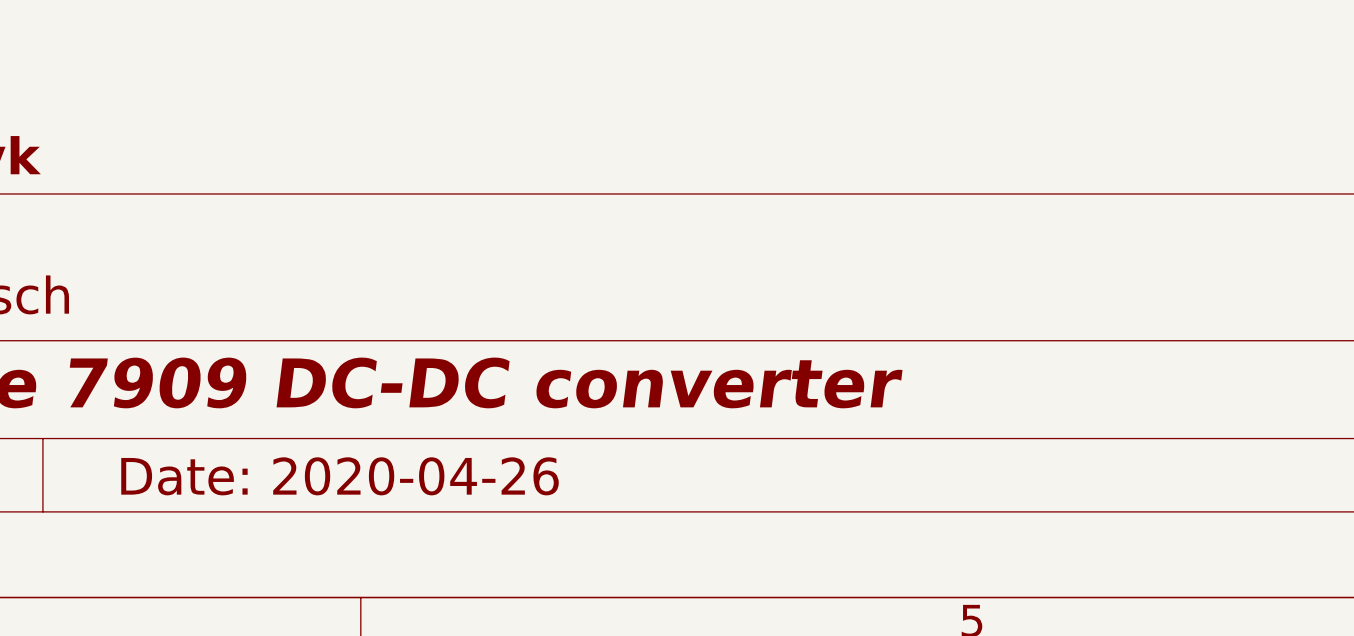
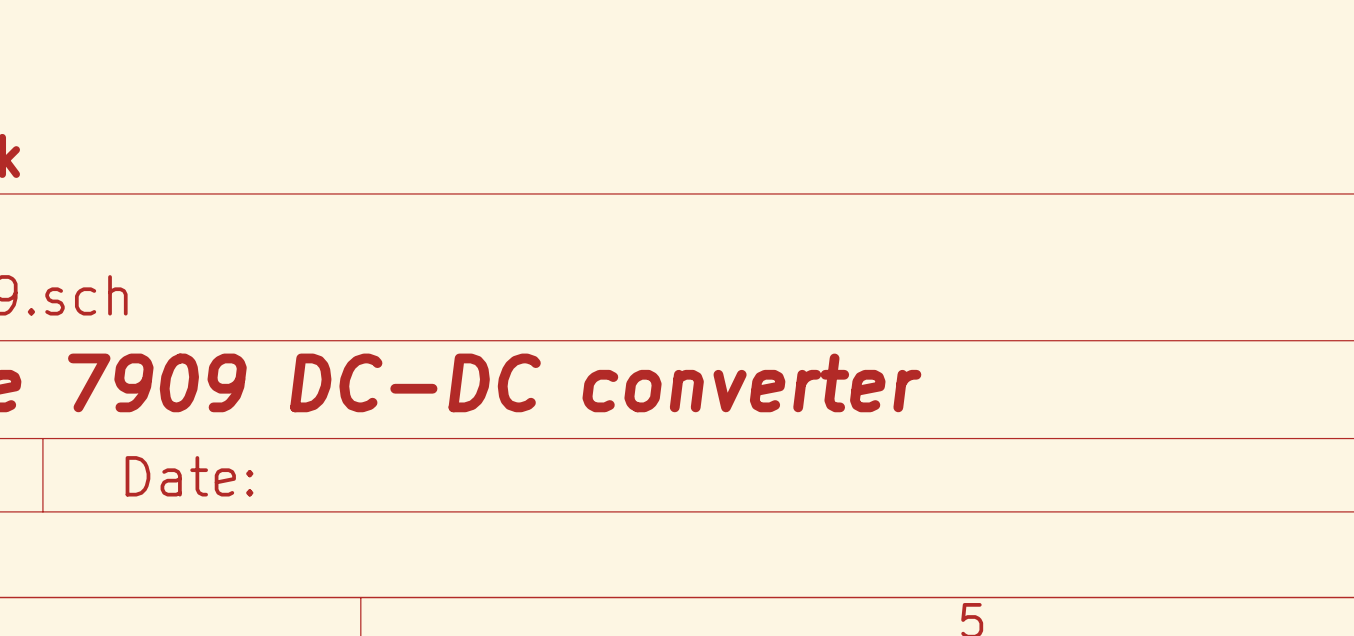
title block: Date: 2020-04-26 (340, 476) -> Date: (189, 476)

